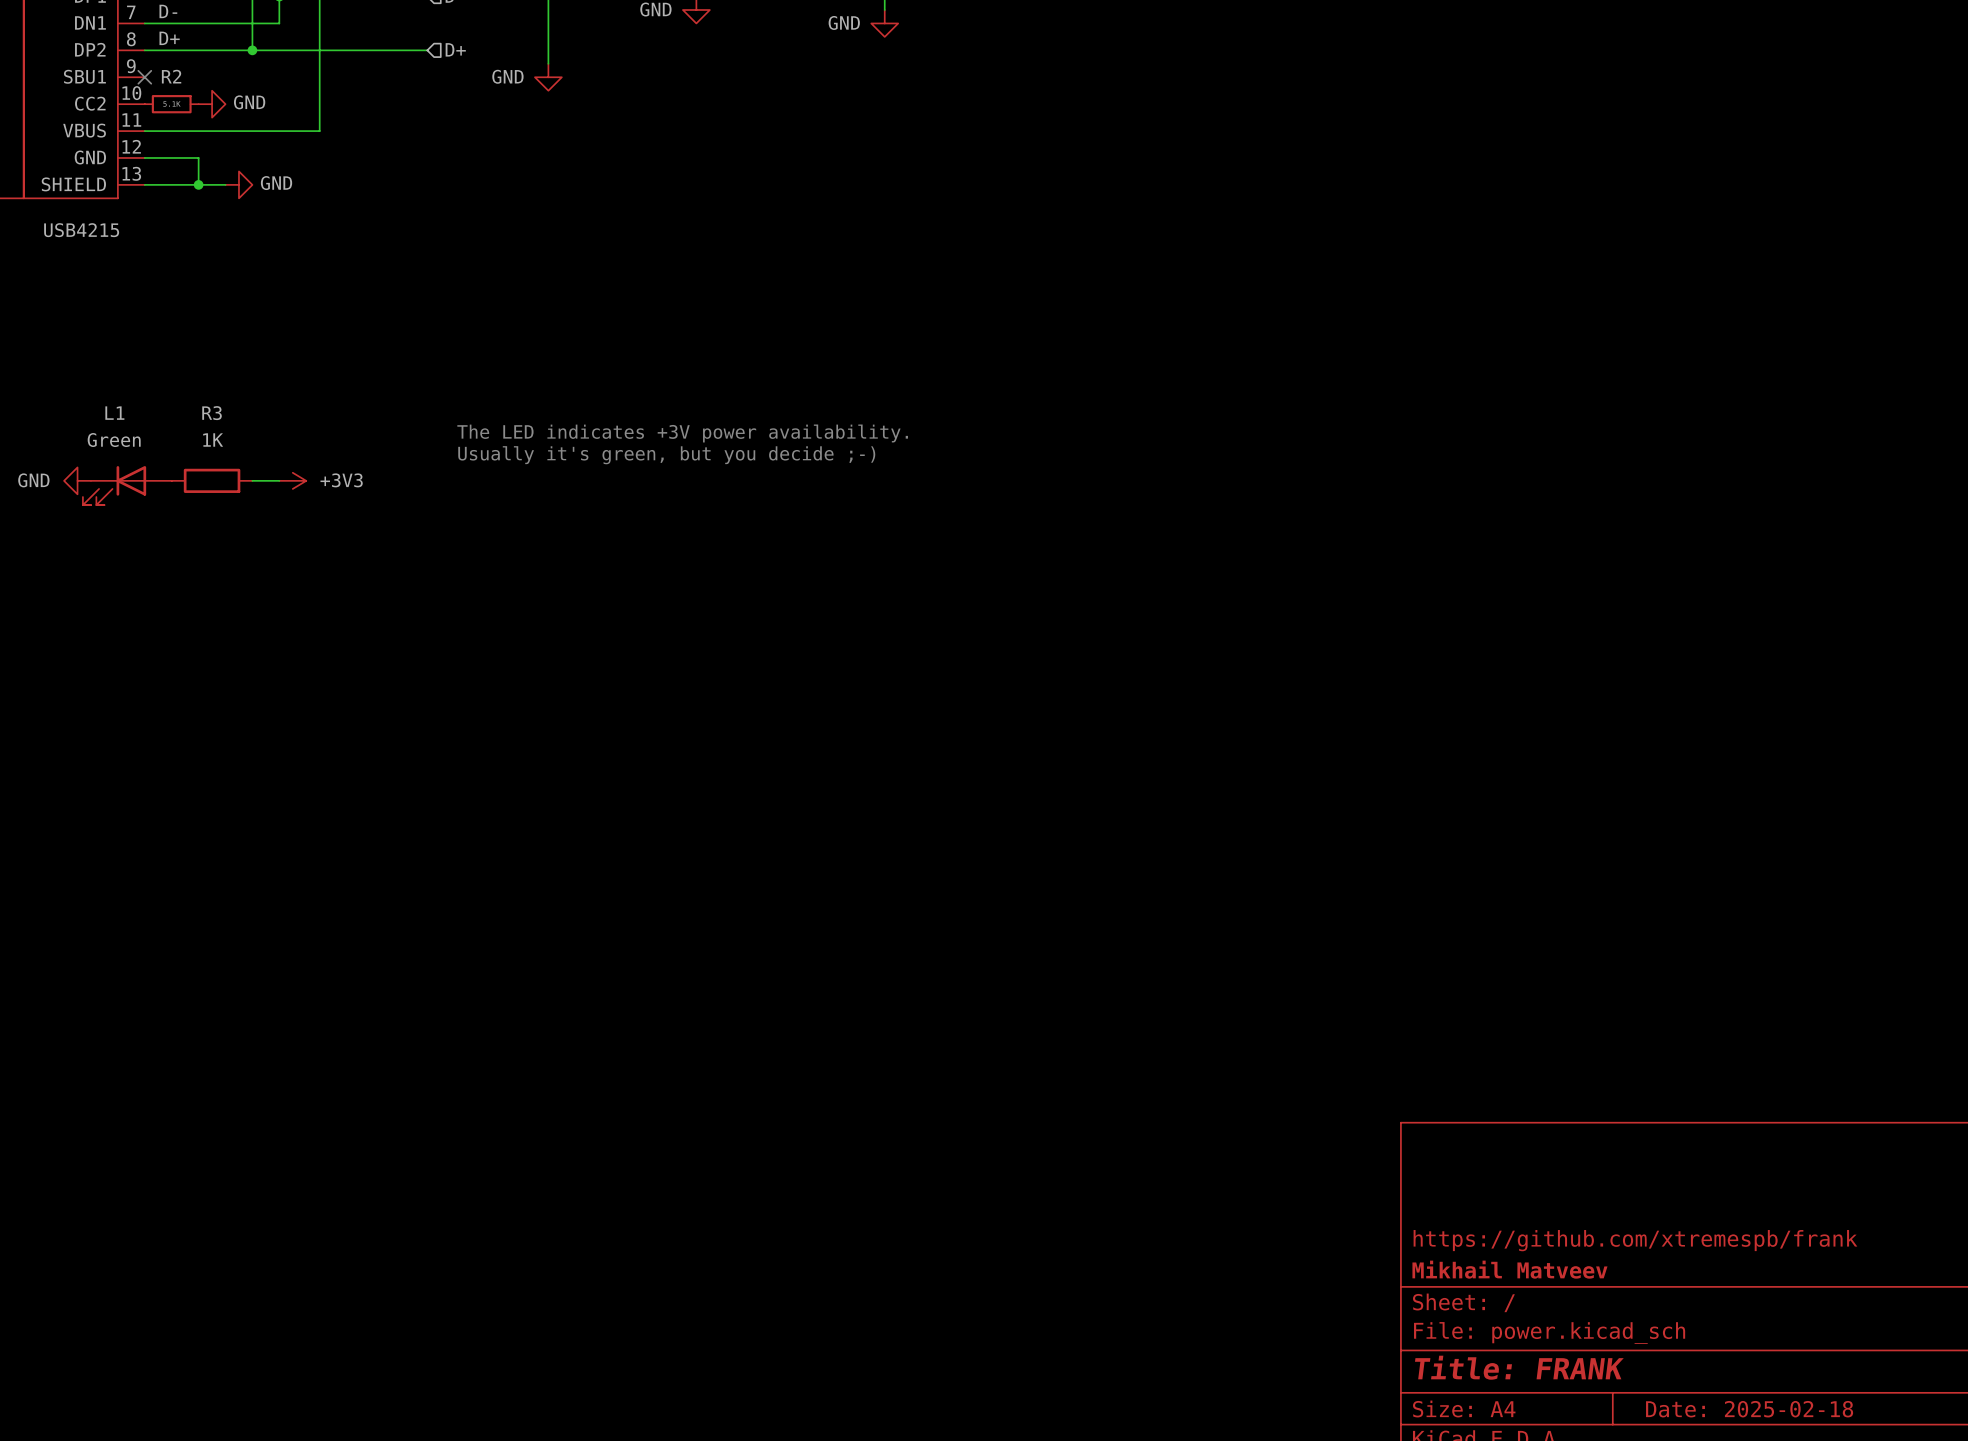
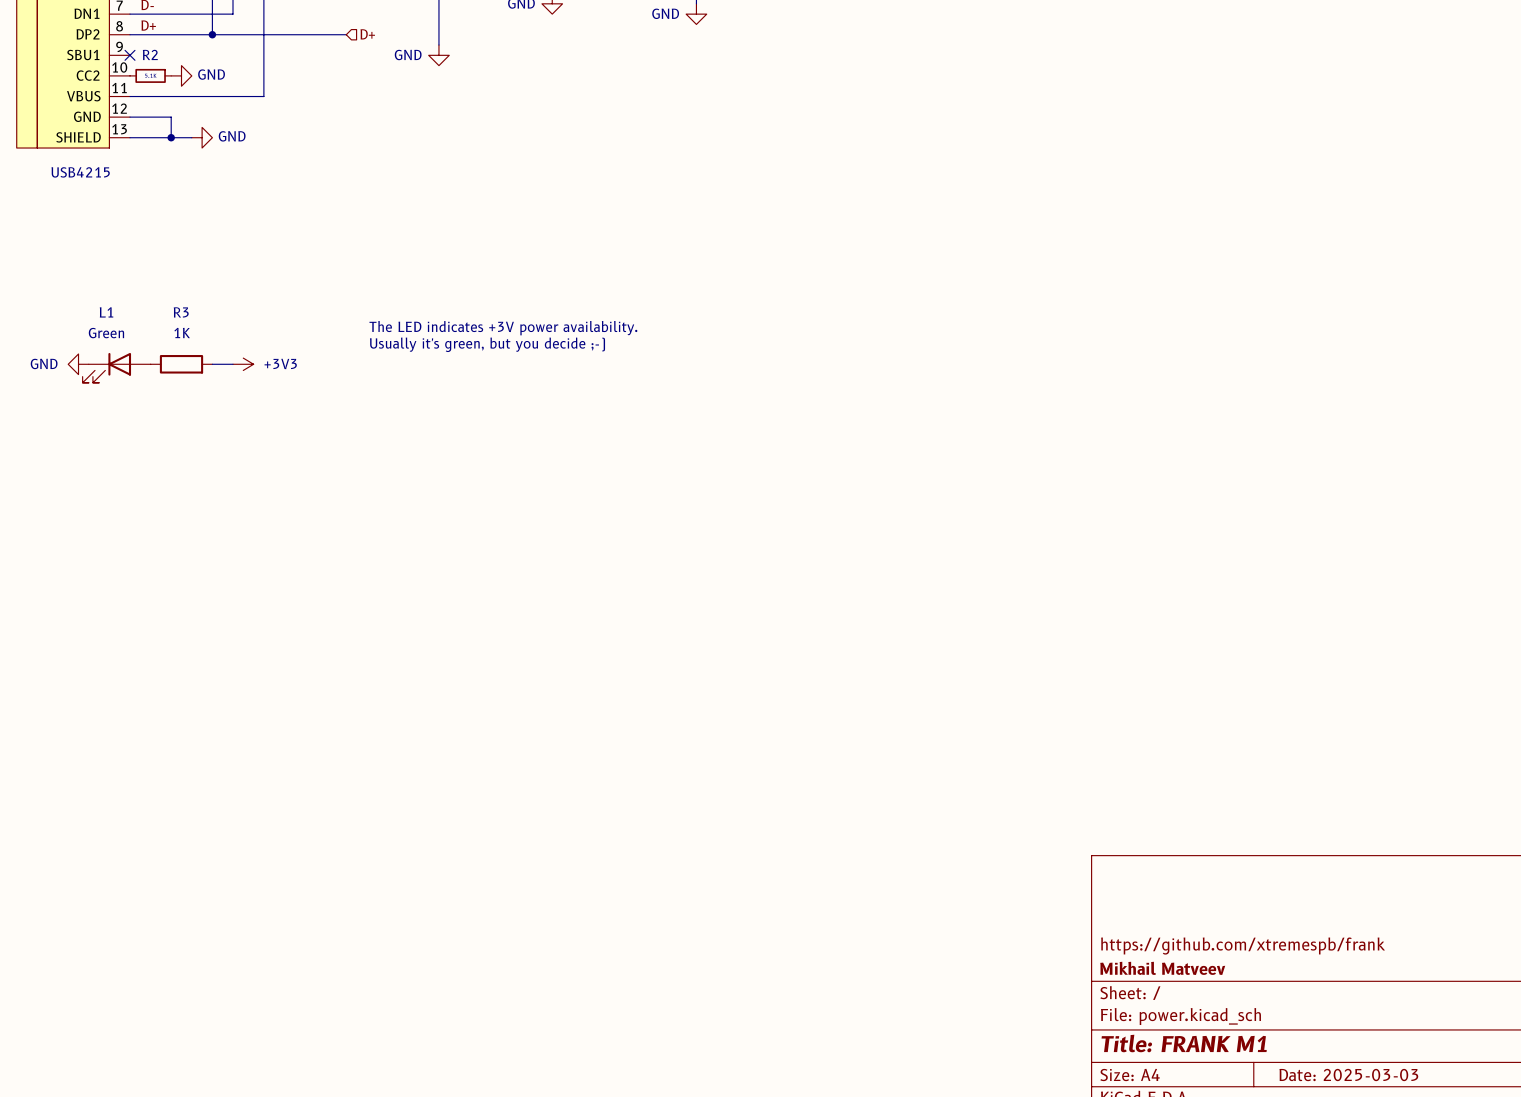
title block: Title: FRANK (1519, 1367) -> Title: FRANK M1 (1184, 1043)
title block: Date: 2025-02-18 (1749, 1409) -> Date: 2025-03-03 (1348, 1075)

